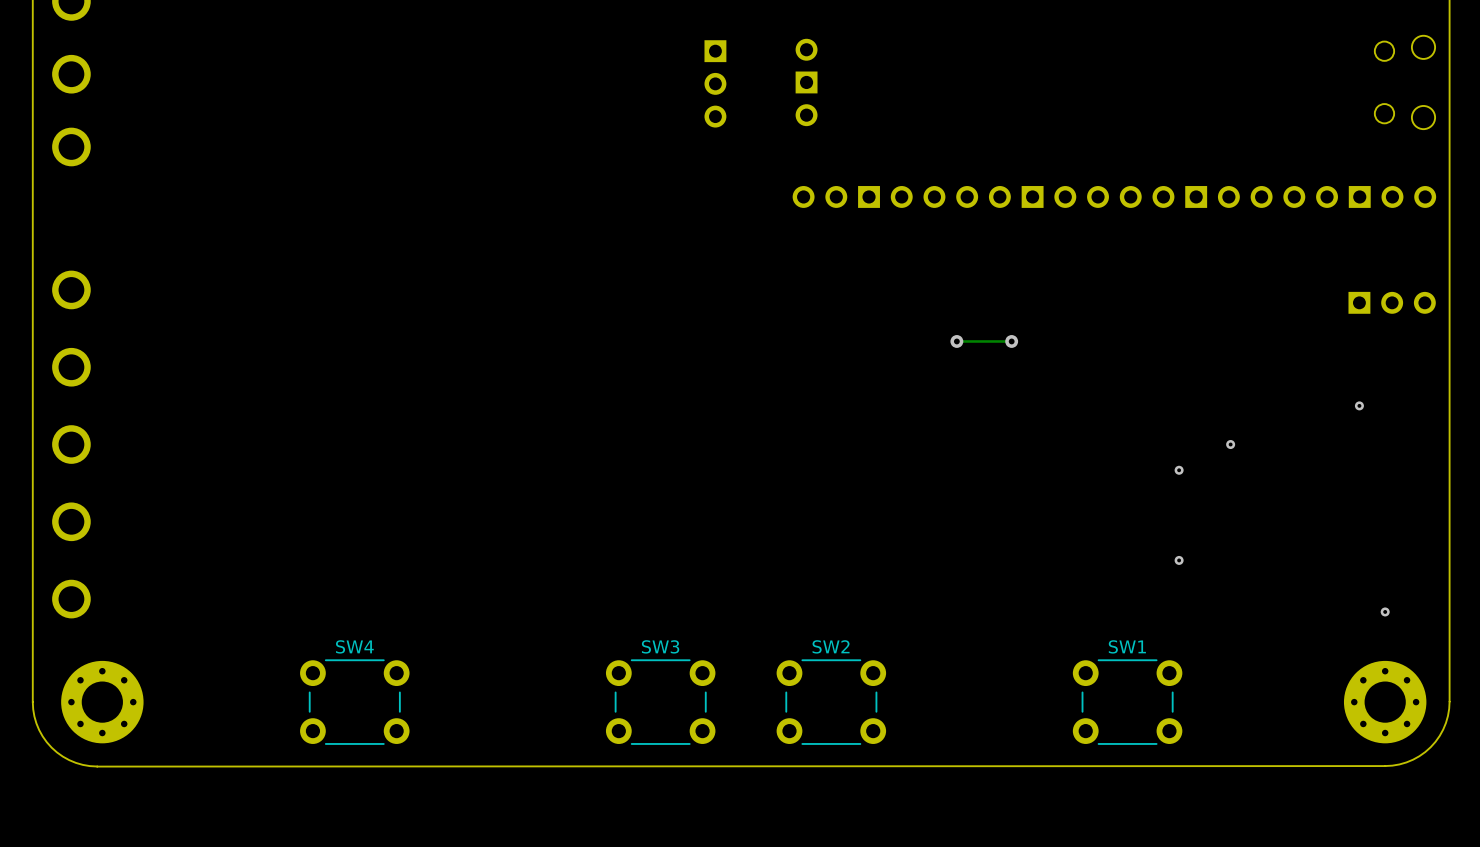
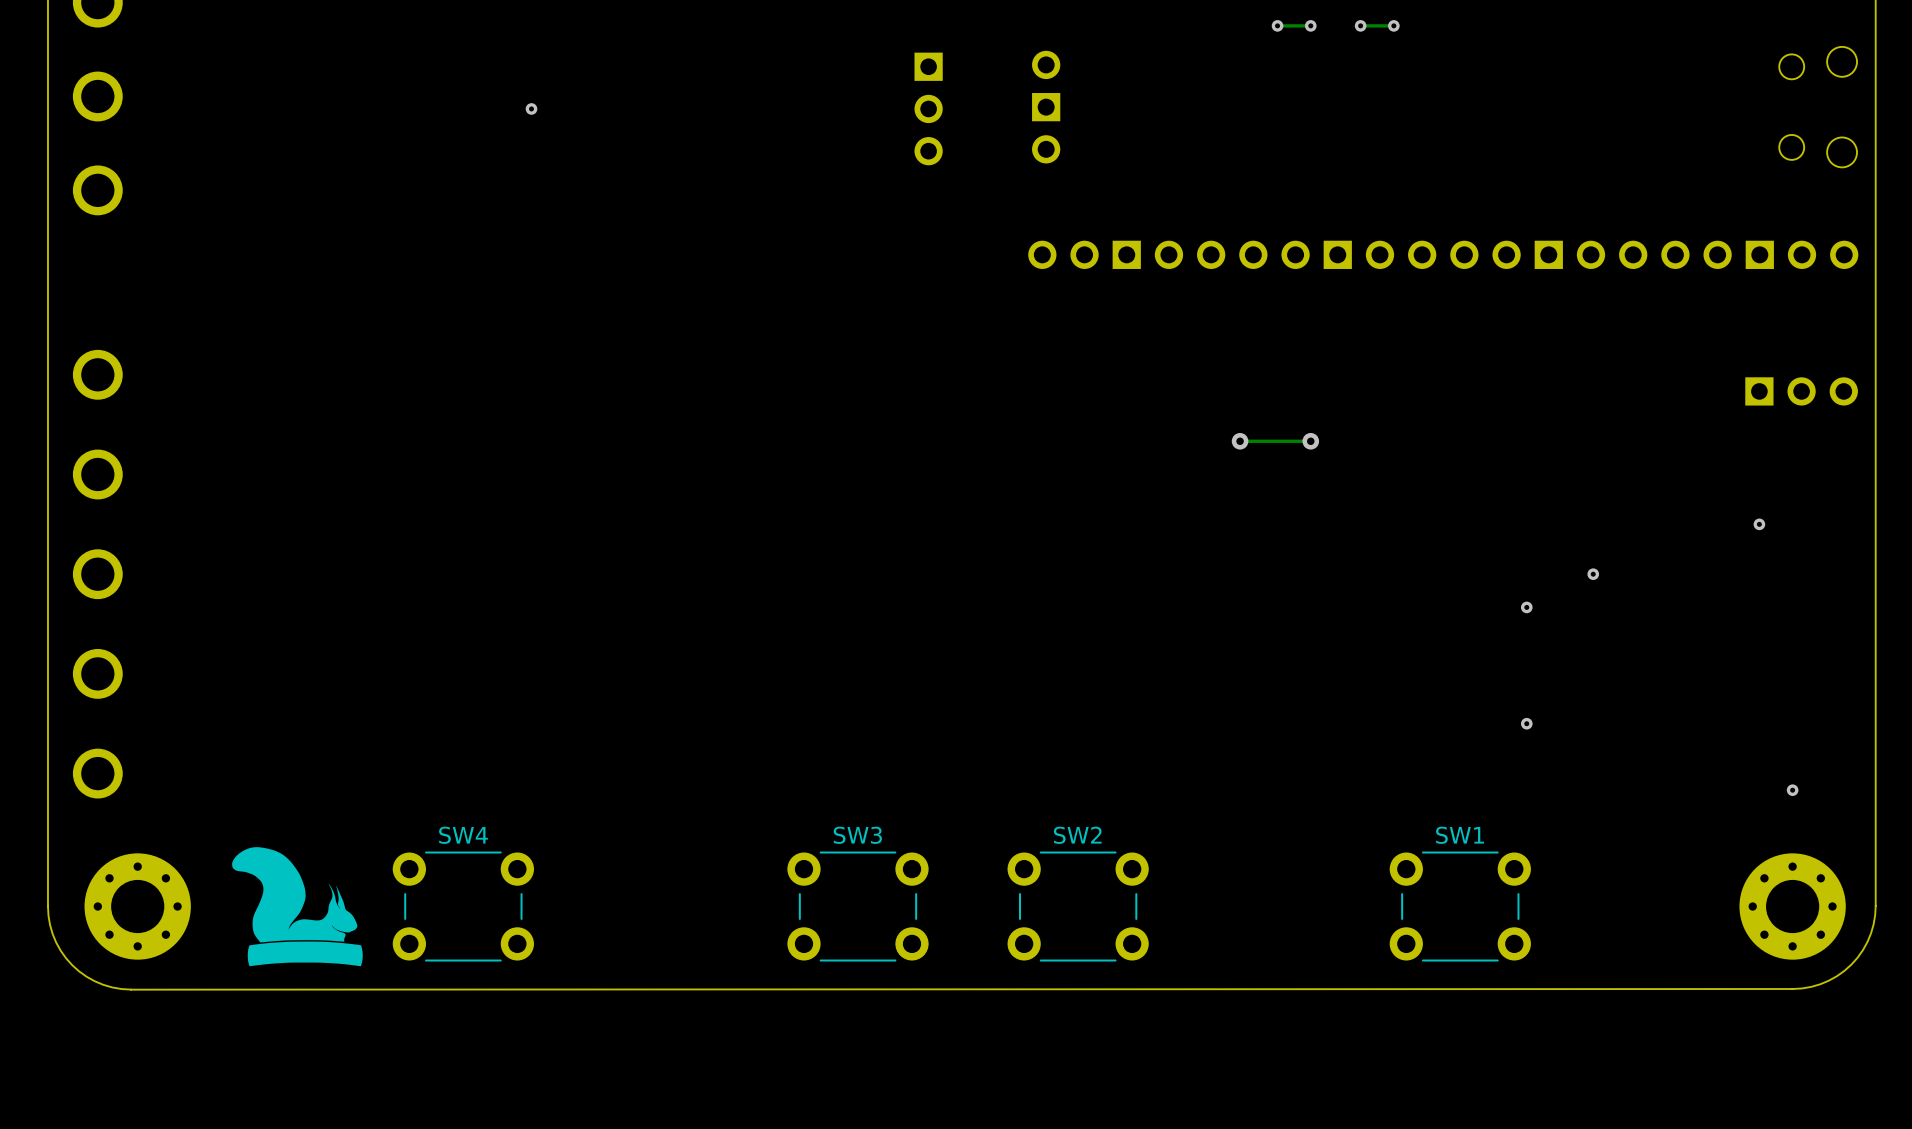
via: none -> (1277, 25)
track: none -> (1310, 25) (1277, 25)
via: none -> (1310, 25)
via: none -> (1360, 25)
track: none -> (1393, 25) (1360, 25)
via: none -> (1393, 25)
via: none -> (531, 108)
drawing: none -> [232, 847, 363, 967]

